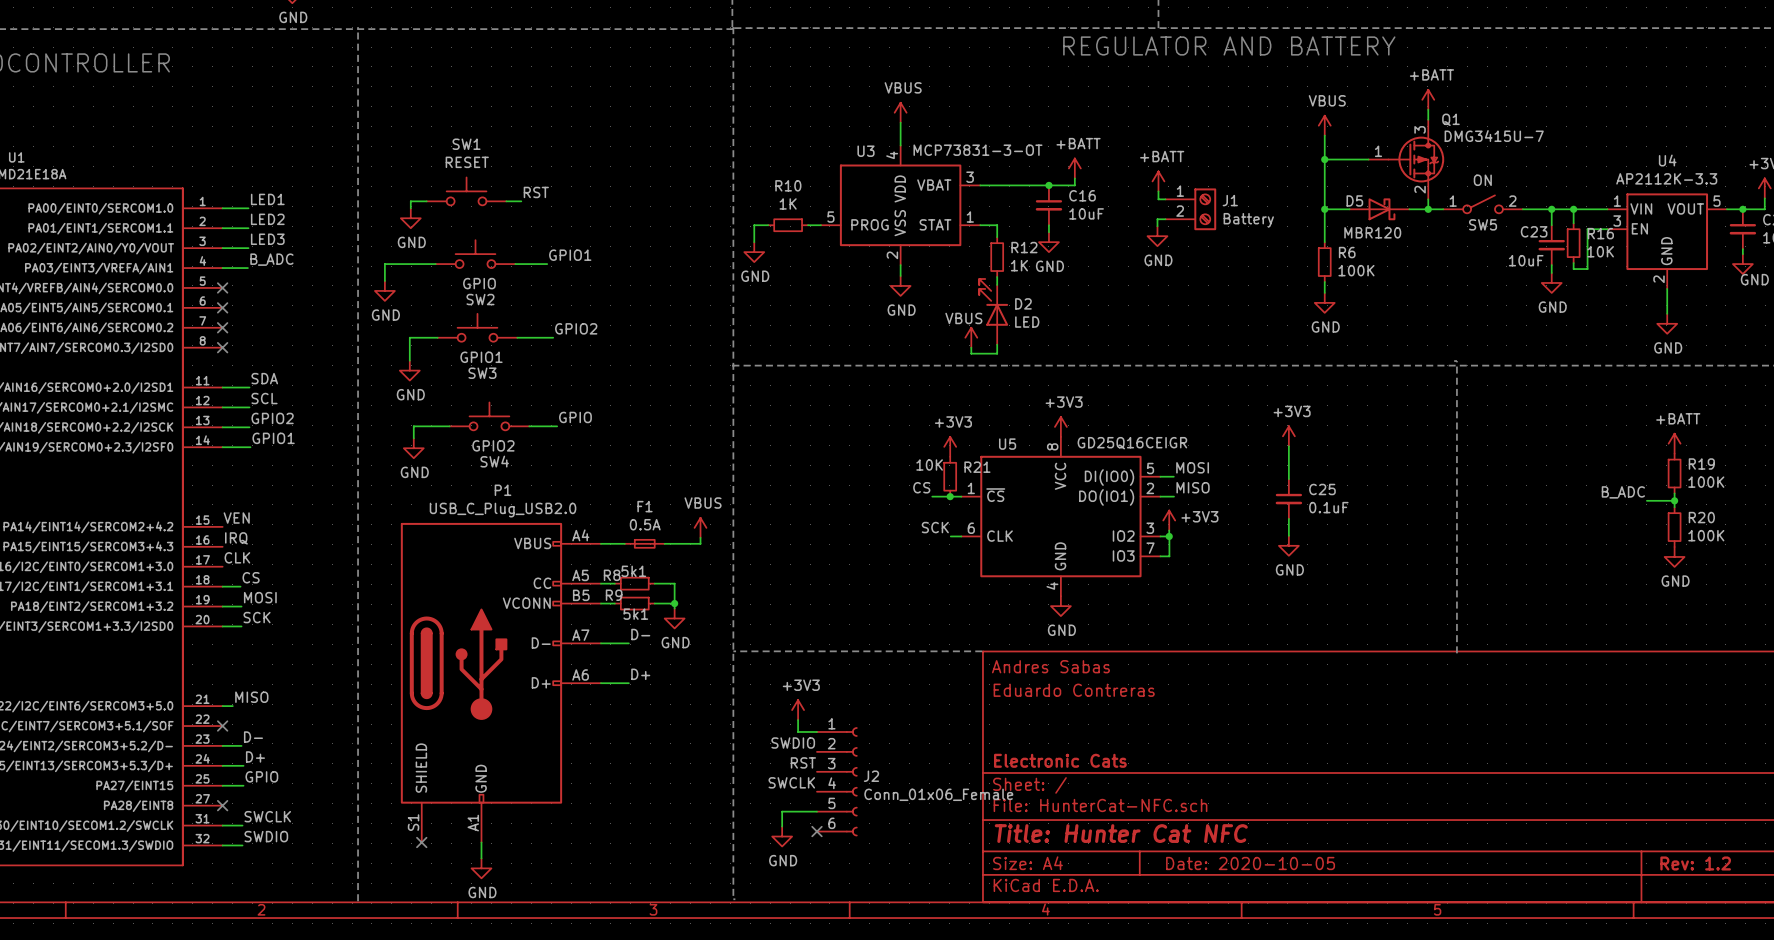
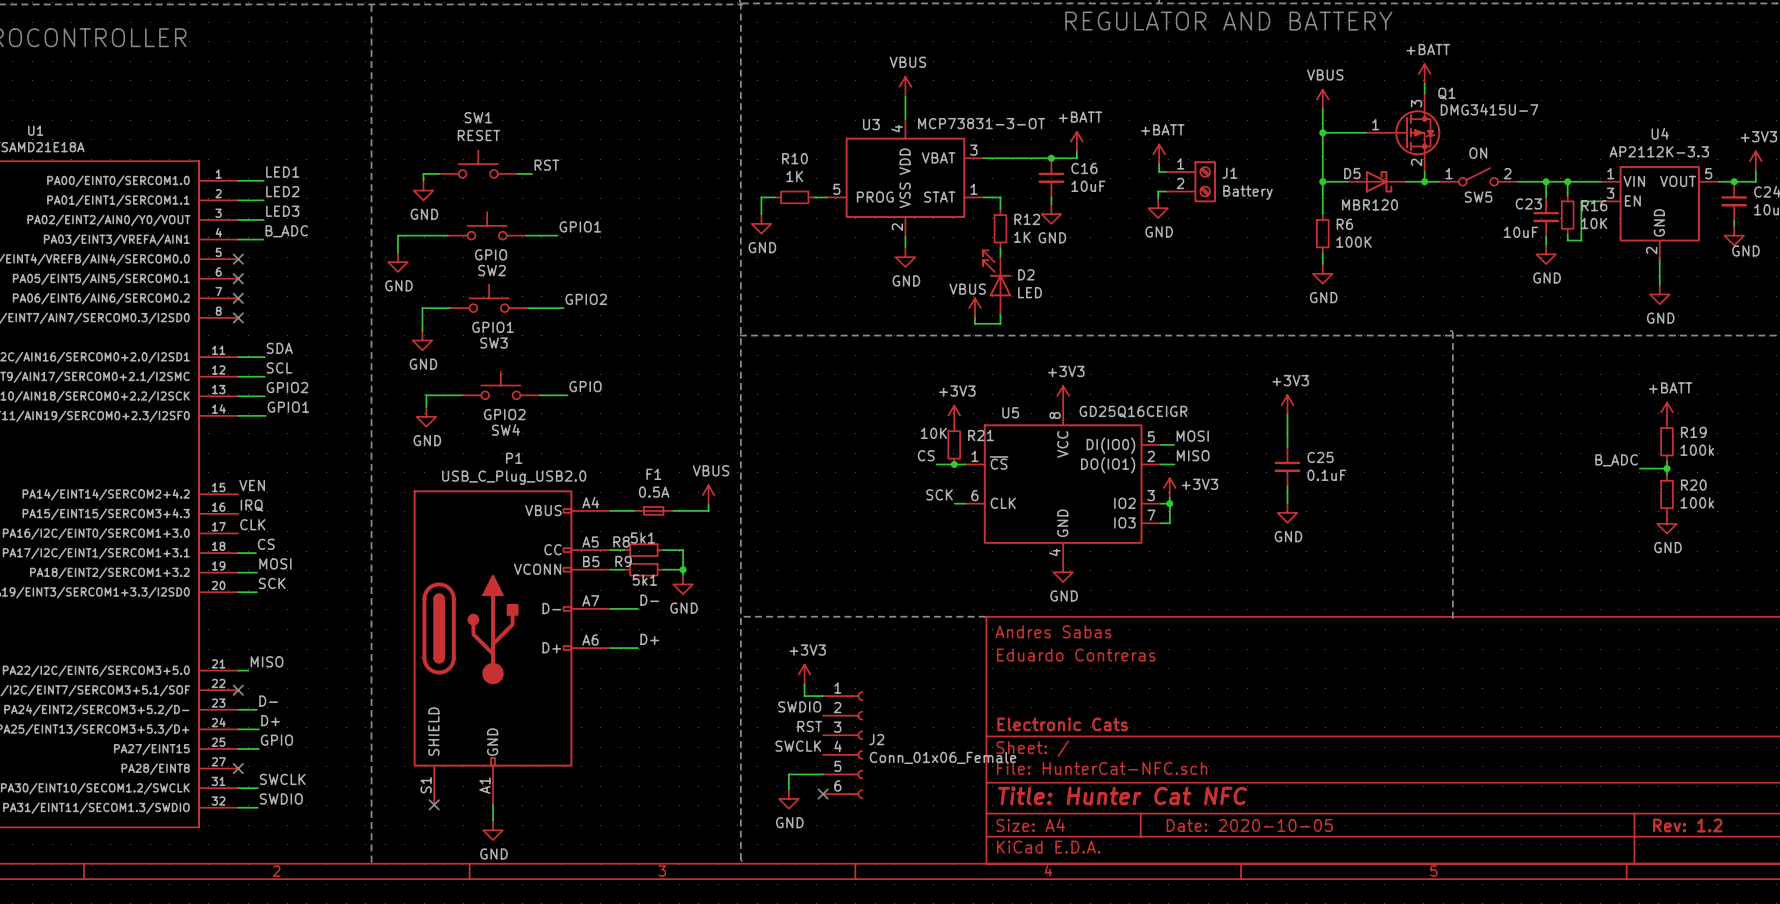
R19 value: 100K (1706, 482) -> 100k (1697, 450)
R20 value: 100K (1706, 535) -> 100k (1697, 502)

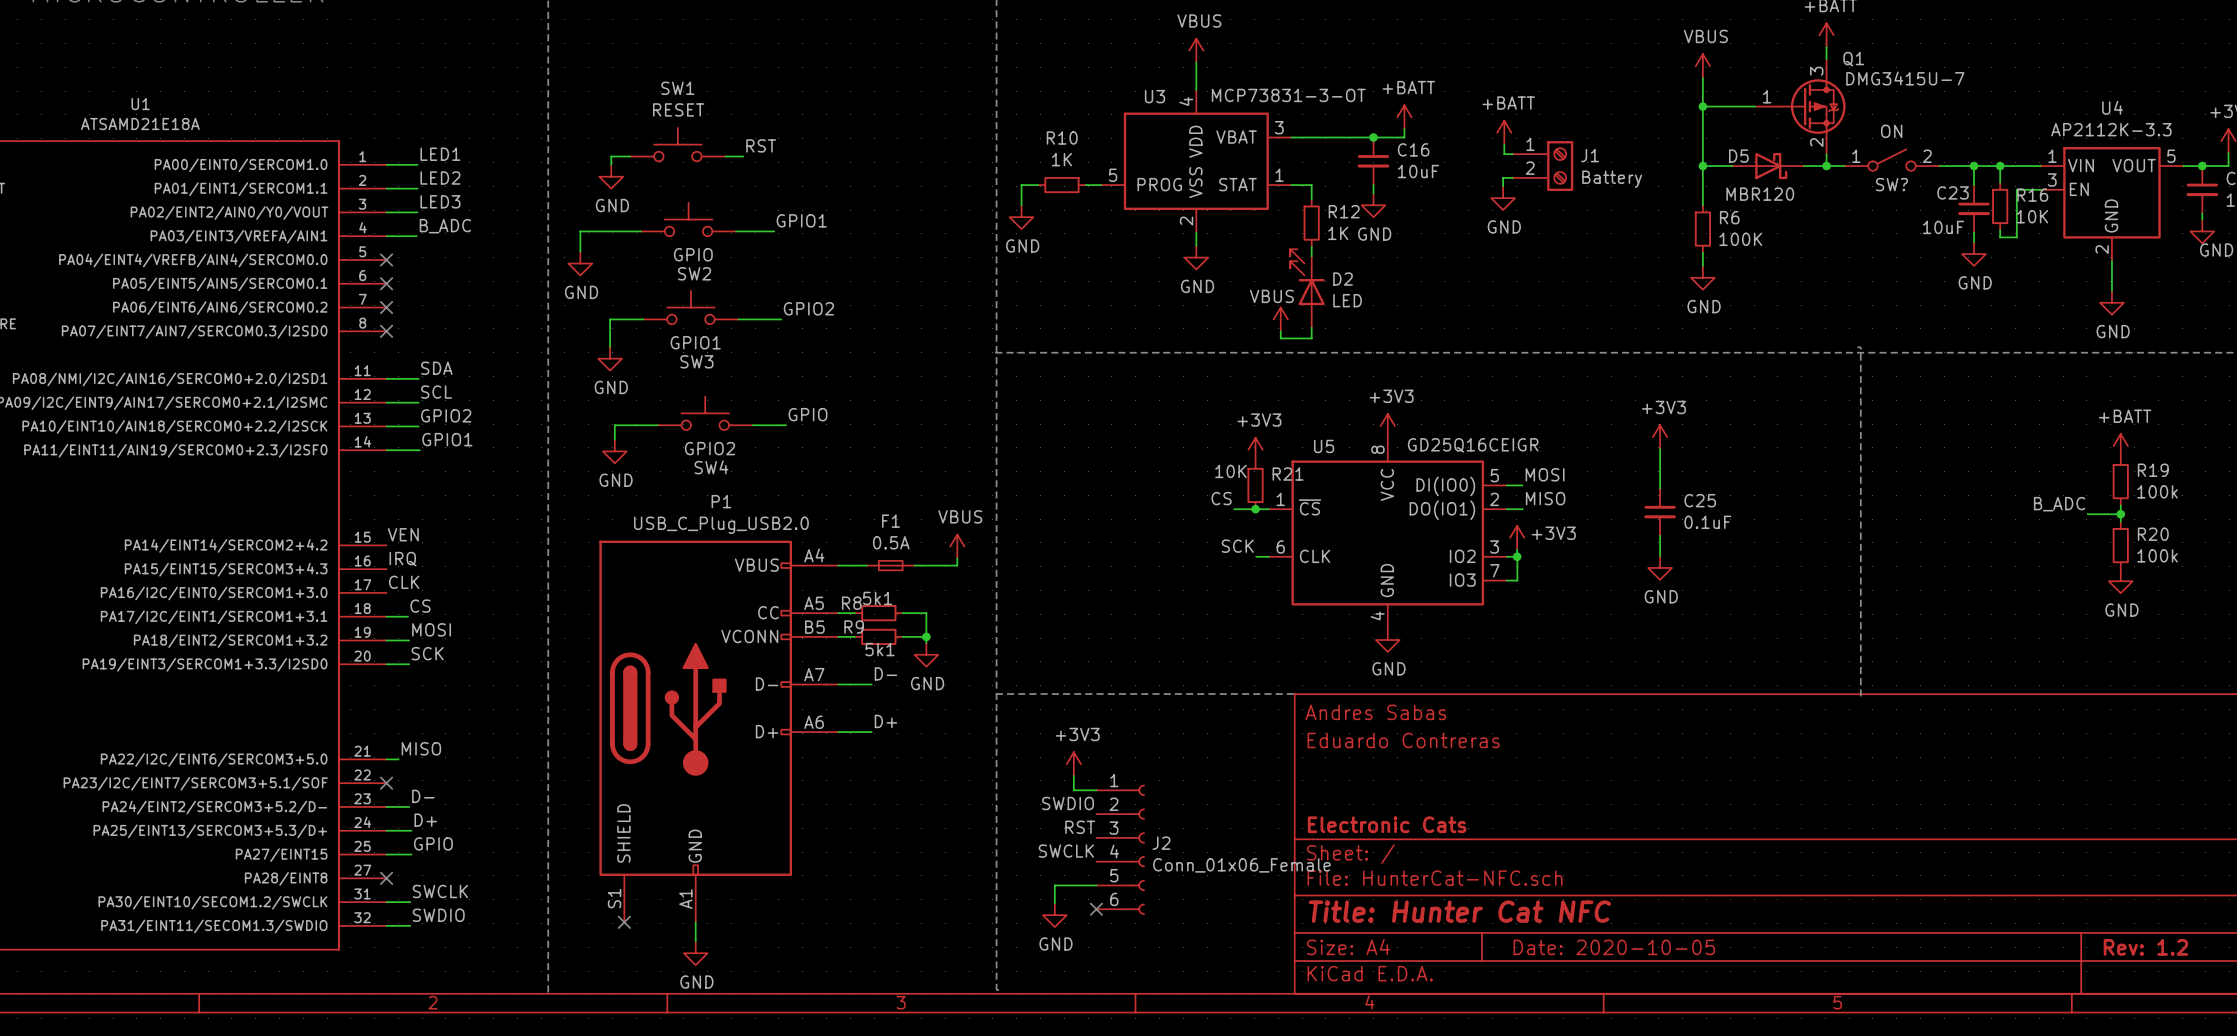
SW5 name: SW5 (1478, 197) -> SW? (1891, 184)

